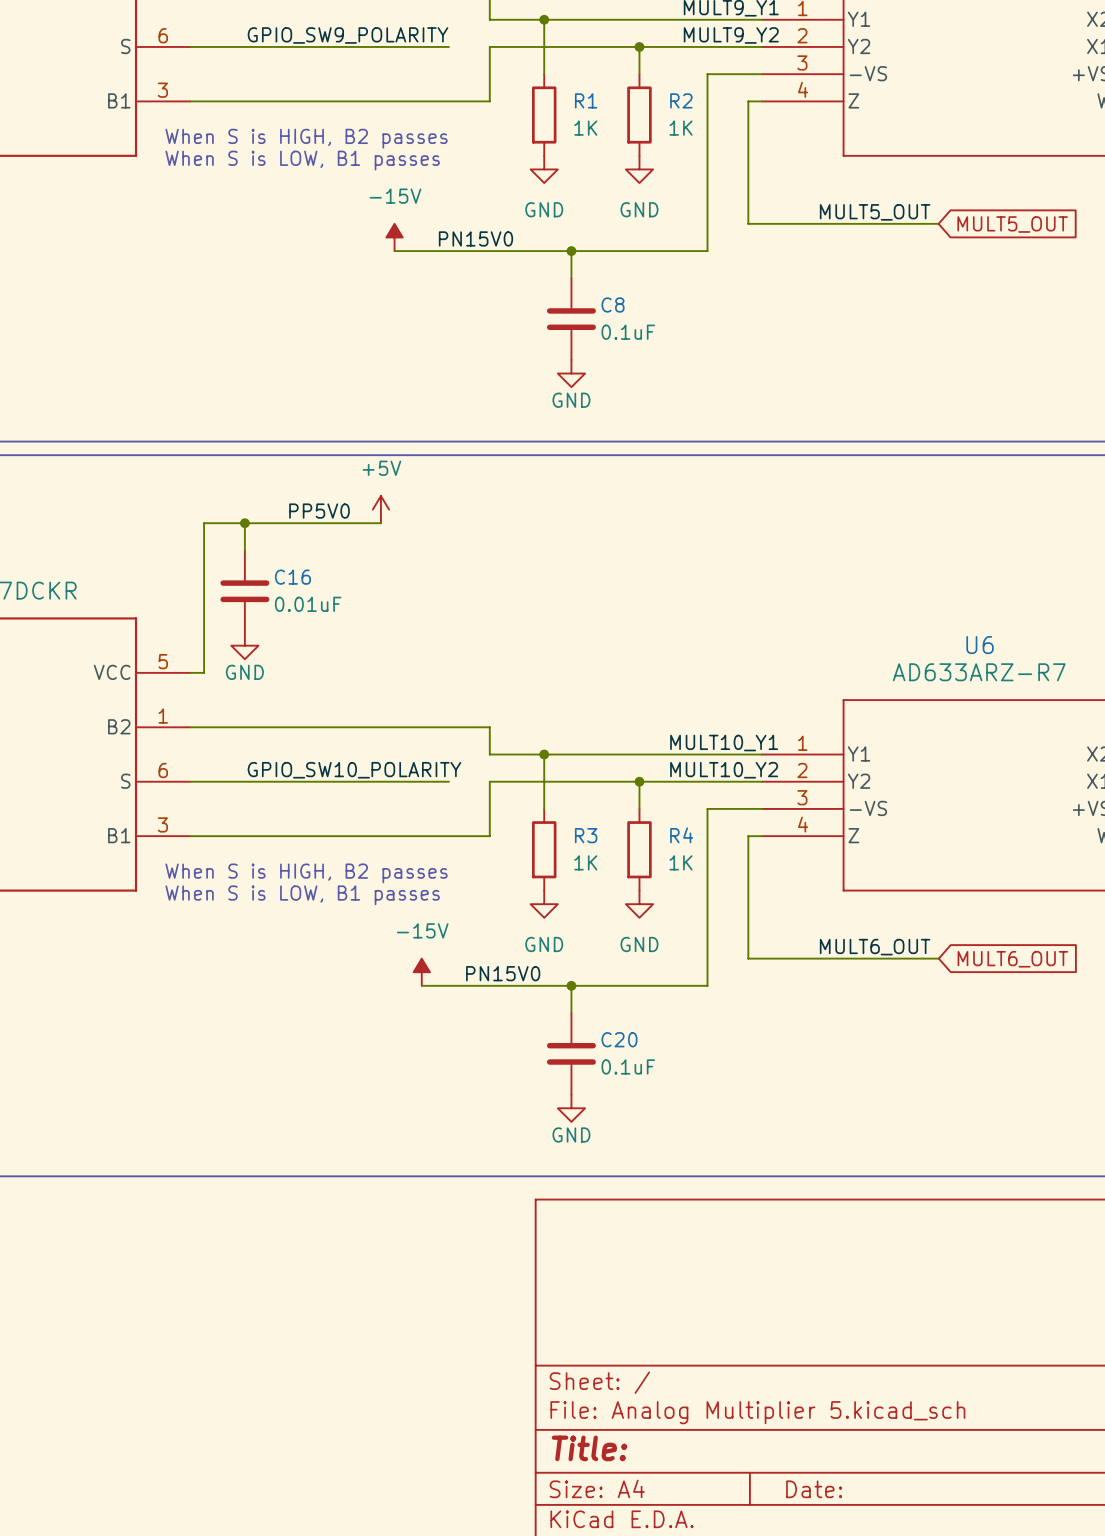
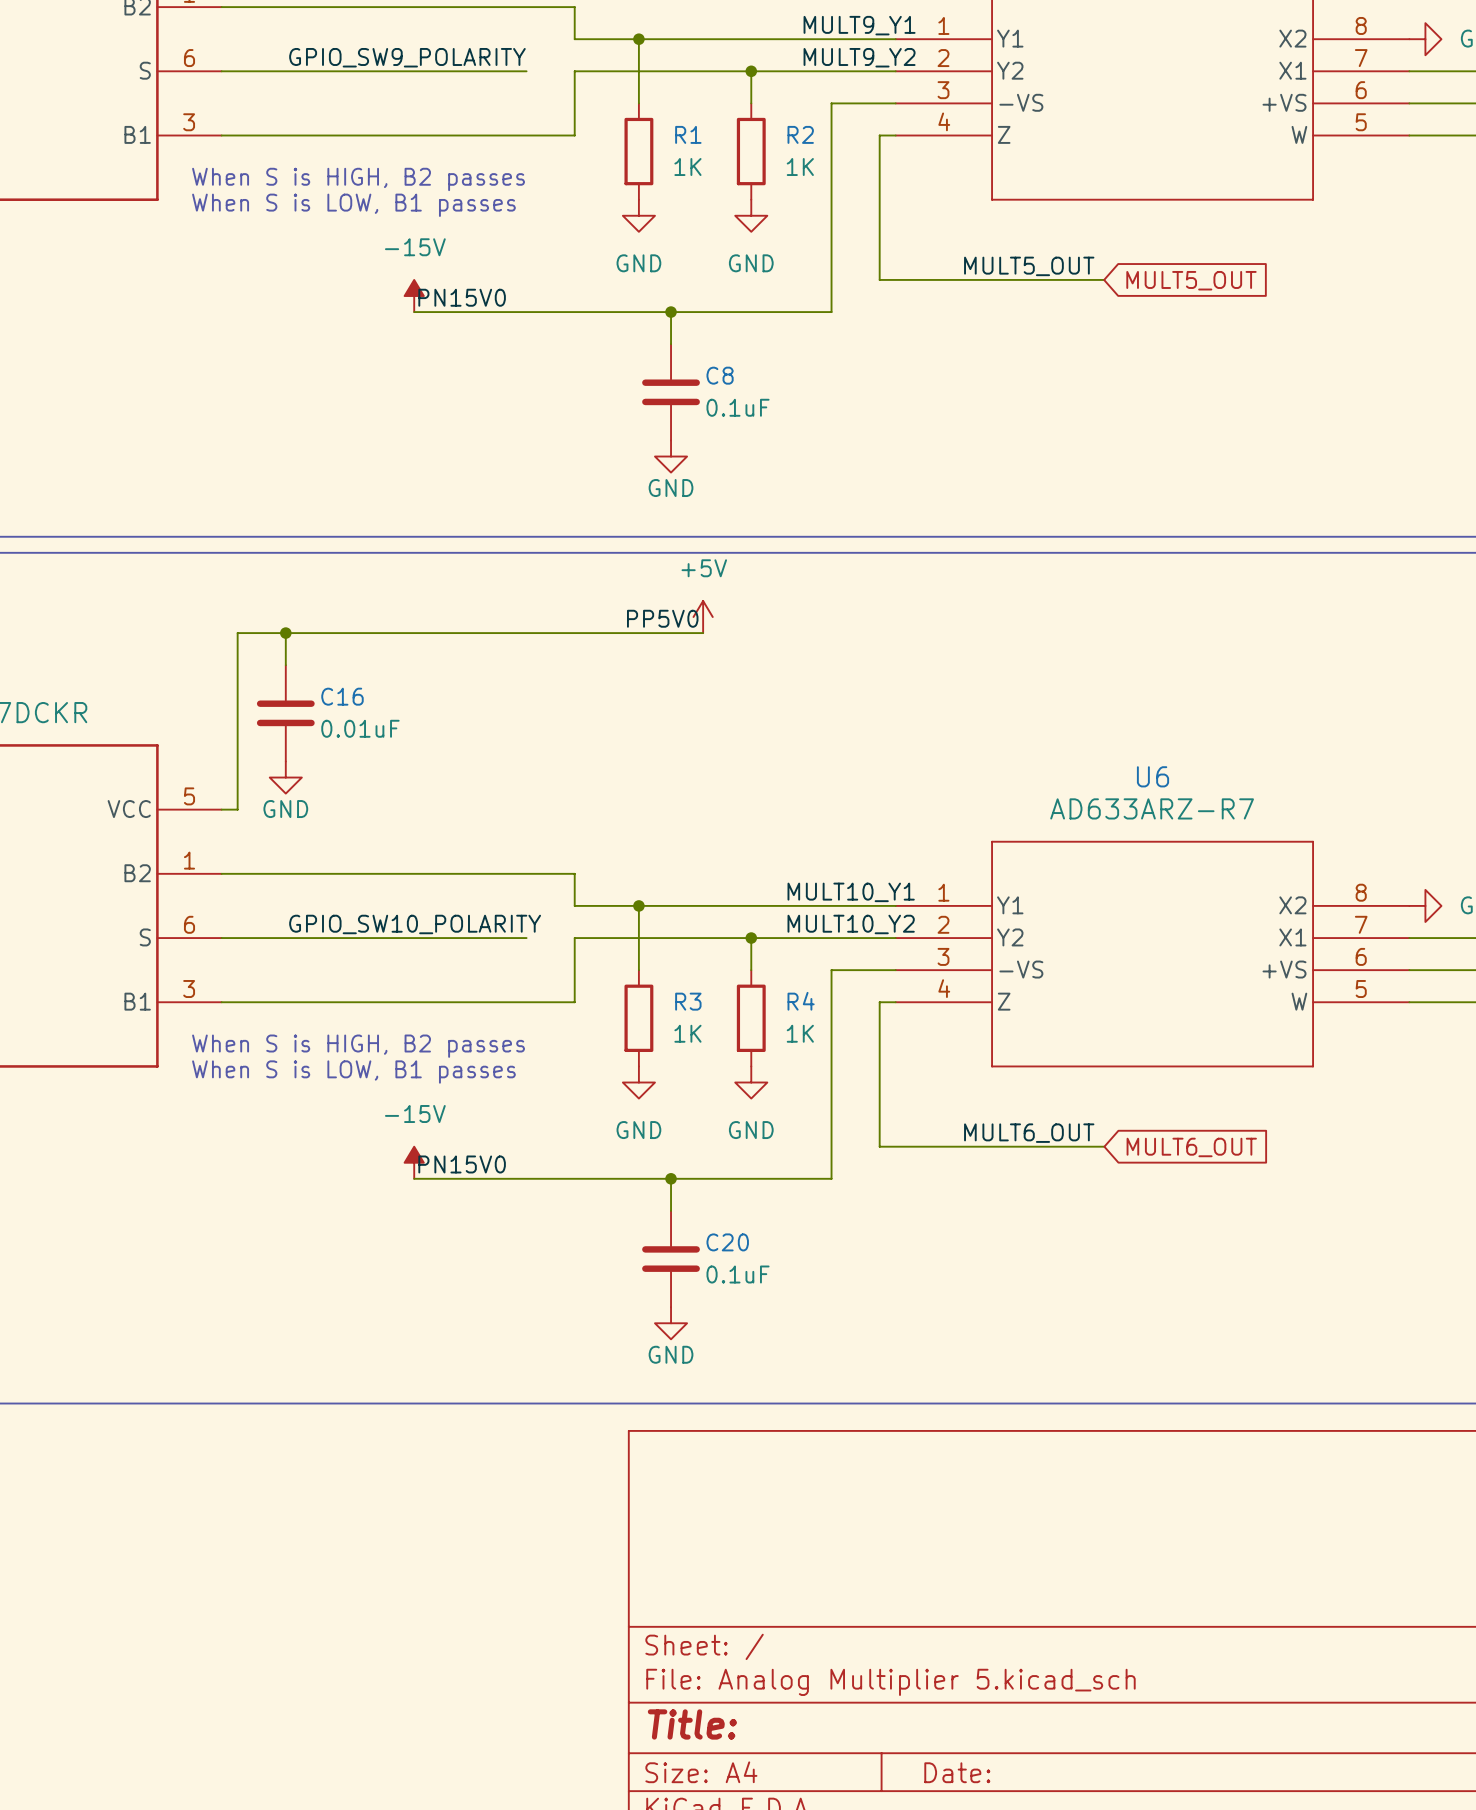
power symbol position: -15V (394, 237) -> -15V (414, 296)
label position: PN15V0 (475, 238) -> PN15V0 (462, 297)
wire: none -> (414, 312) (462, 312)
power symbol position: +5V (380, 509) -> +5V (703, 617)
label position: PP5V0 (319, 511) -> PP5V0 (662, 618)
wire: none -> (446, 633) (703, 633)
power symbol position: -15V (421, 972) -> -15V (414, 1162)
label position: PN15V0 (503, 973) -> PN15V0 (462, 1164)
wire: none -> (414, 1178) (494, 1178)

